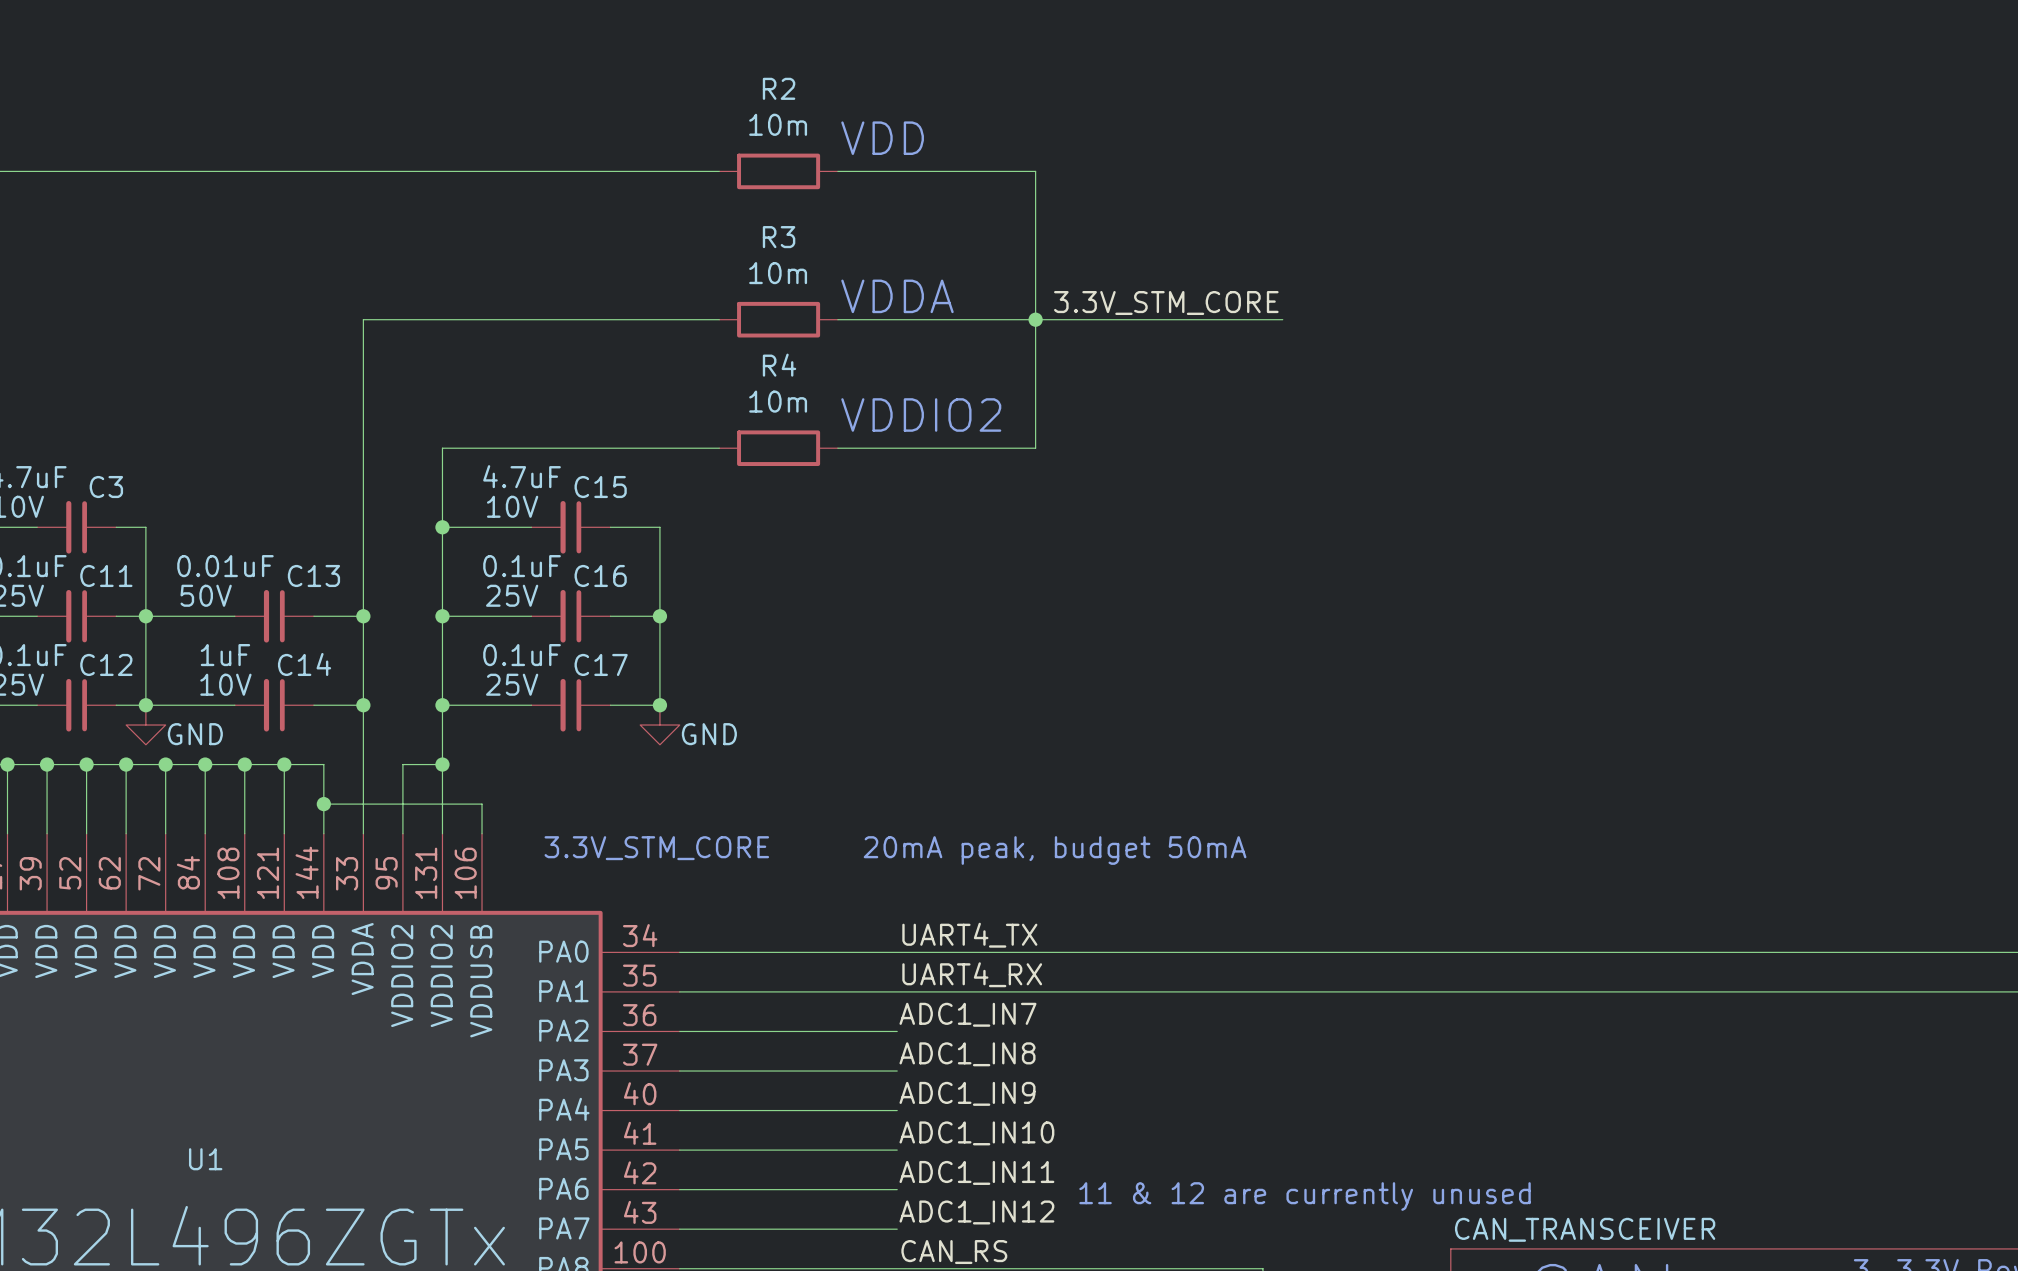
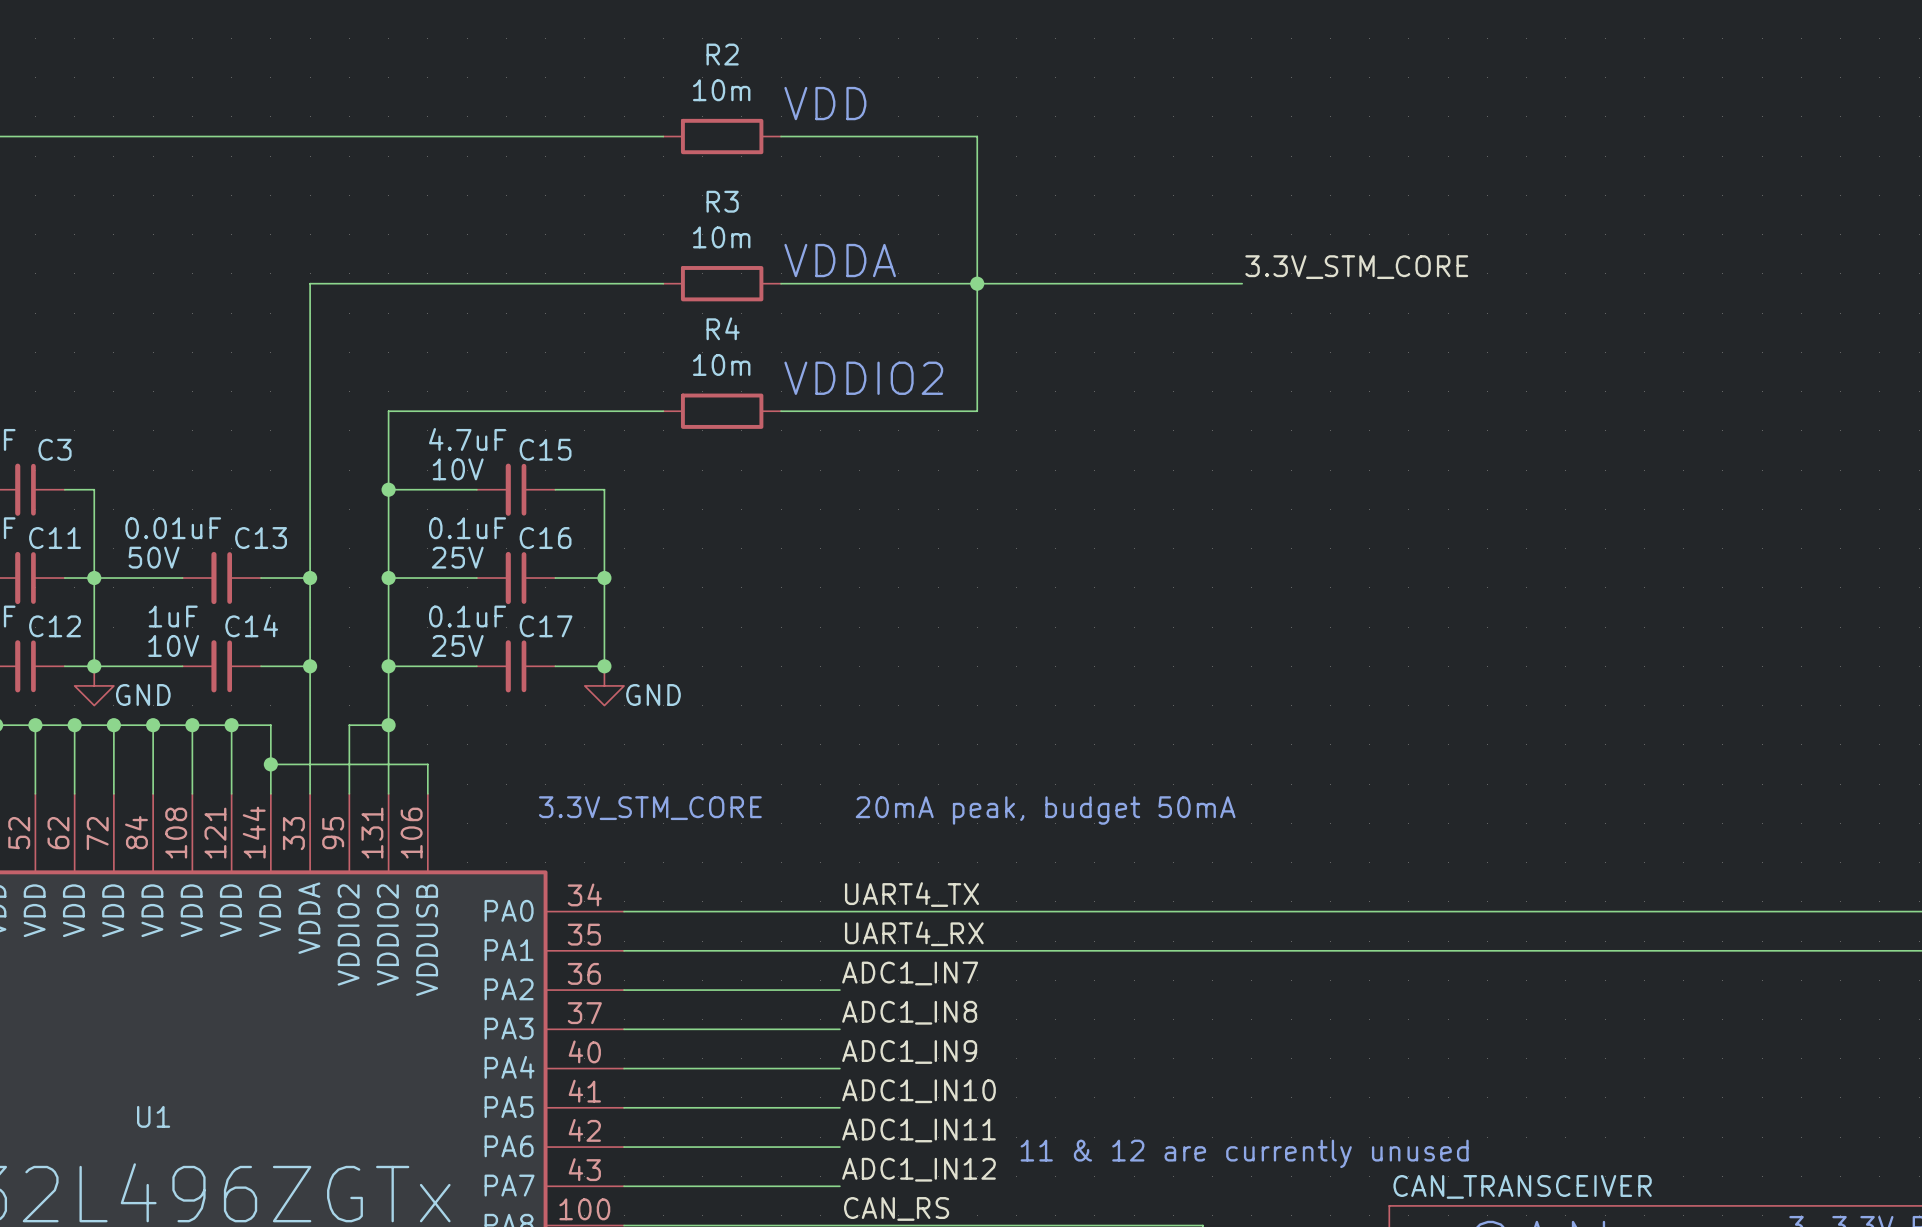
label position: 3.3V_STM_CORE (1166, 302) -> 3.3V_STM_CORE (1356, 267)
wire: none -> (1222, 283) (1242, 283)
text position: 3.3V_STM_CORE 20mA peak, budget 50mA (895, 850) -> 3.3V_STM_CORE 20mA peak, budget 50mA (887, 810)

